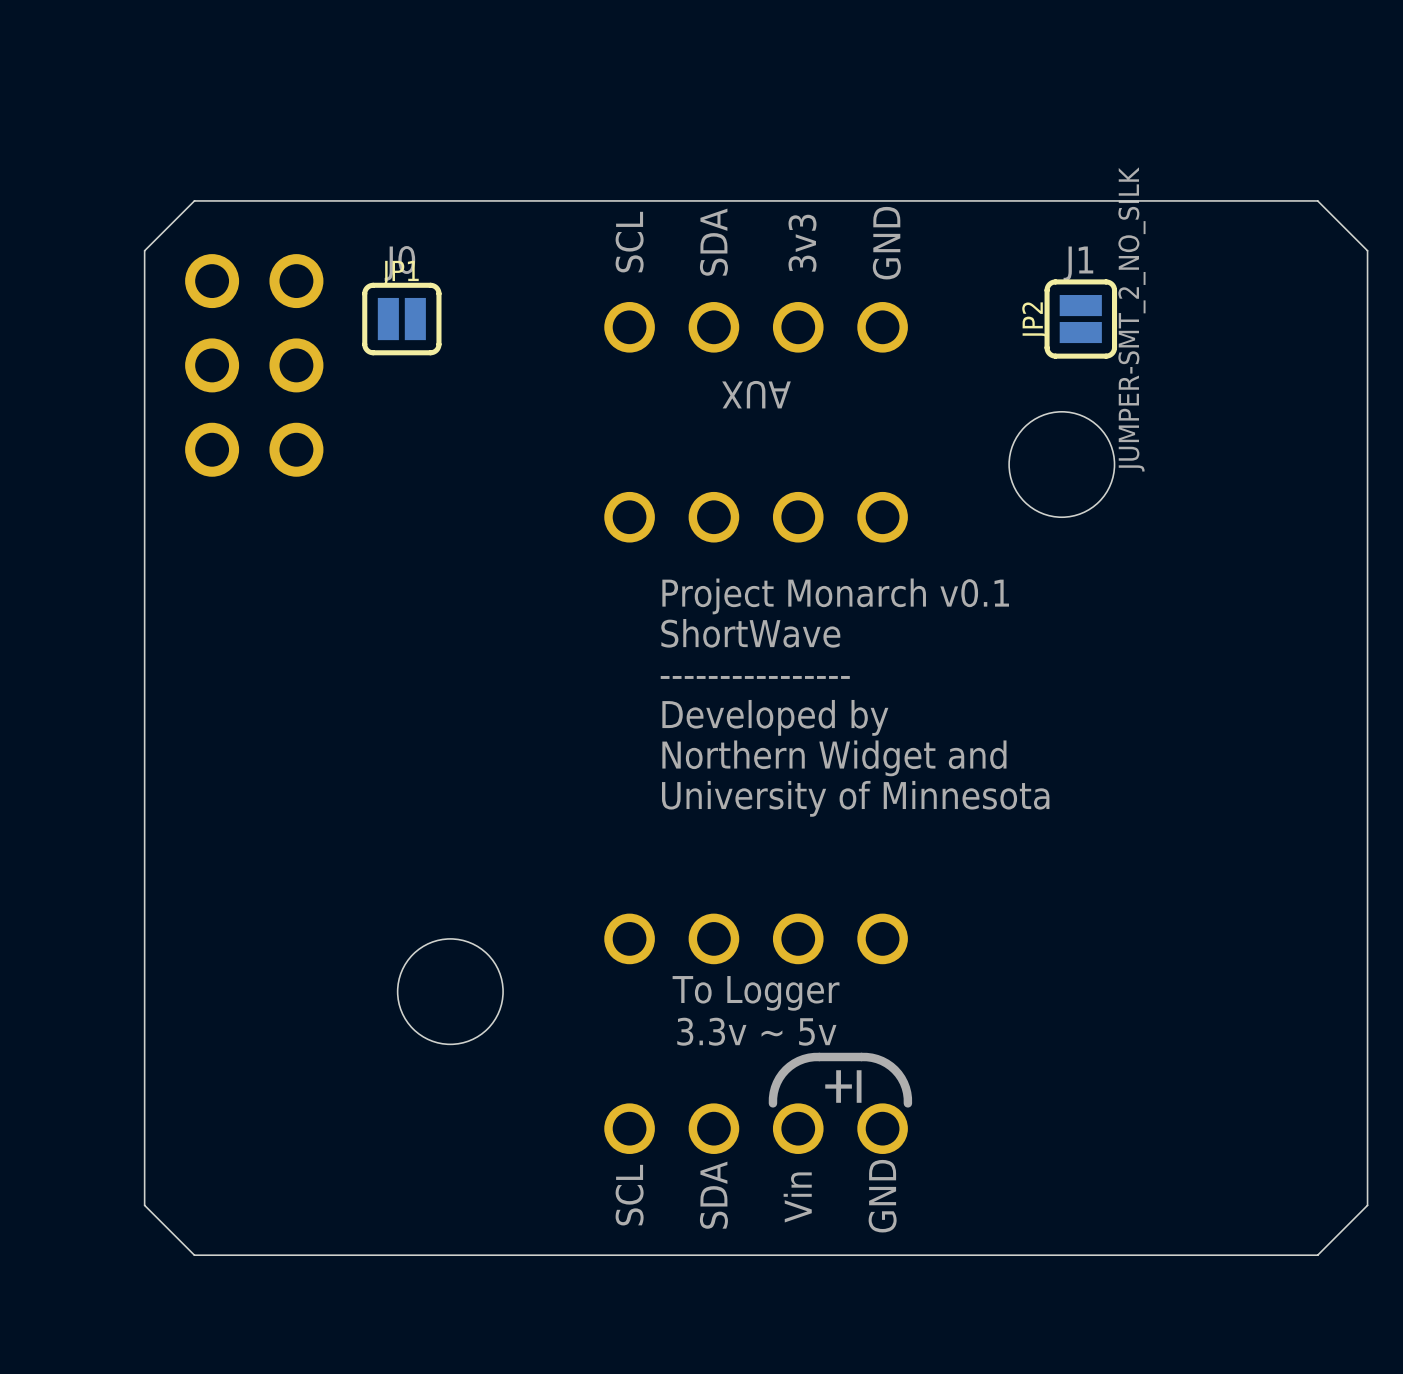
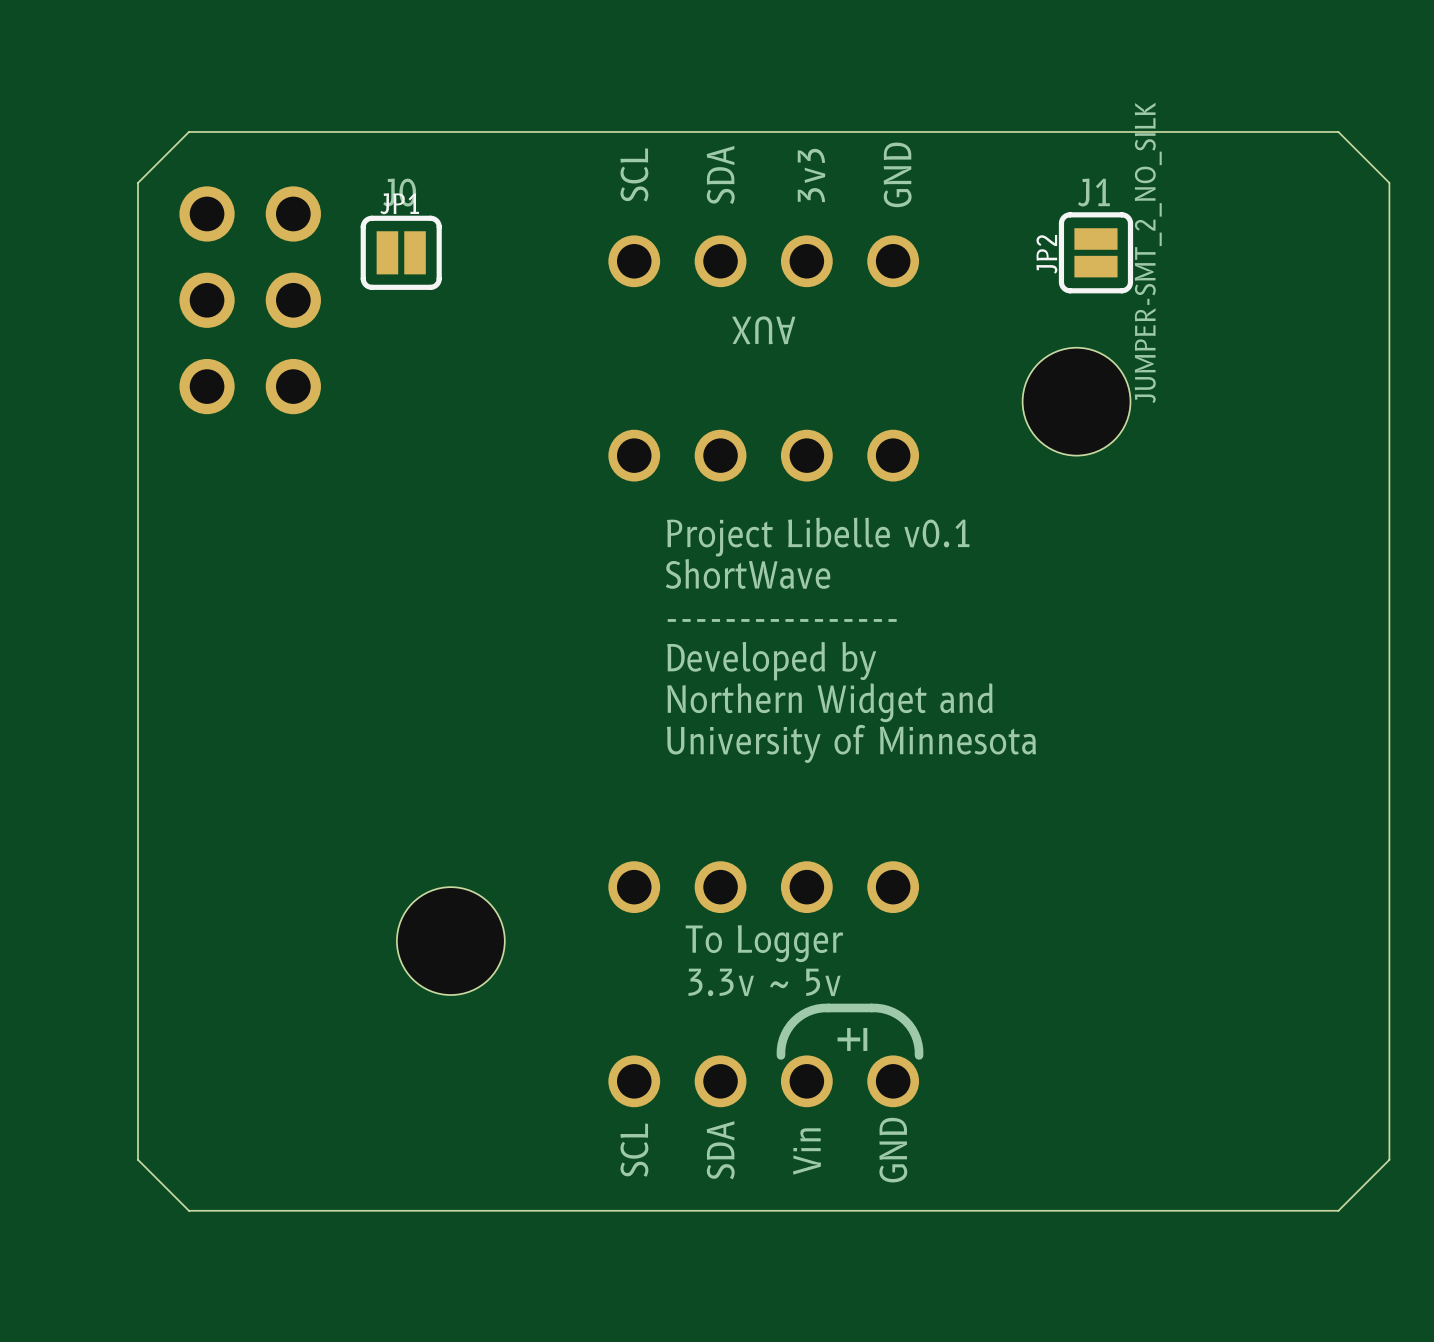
text: Project Monarch v0.1 (835, 596) -> Project Libelle v0.1 (818, 537)

